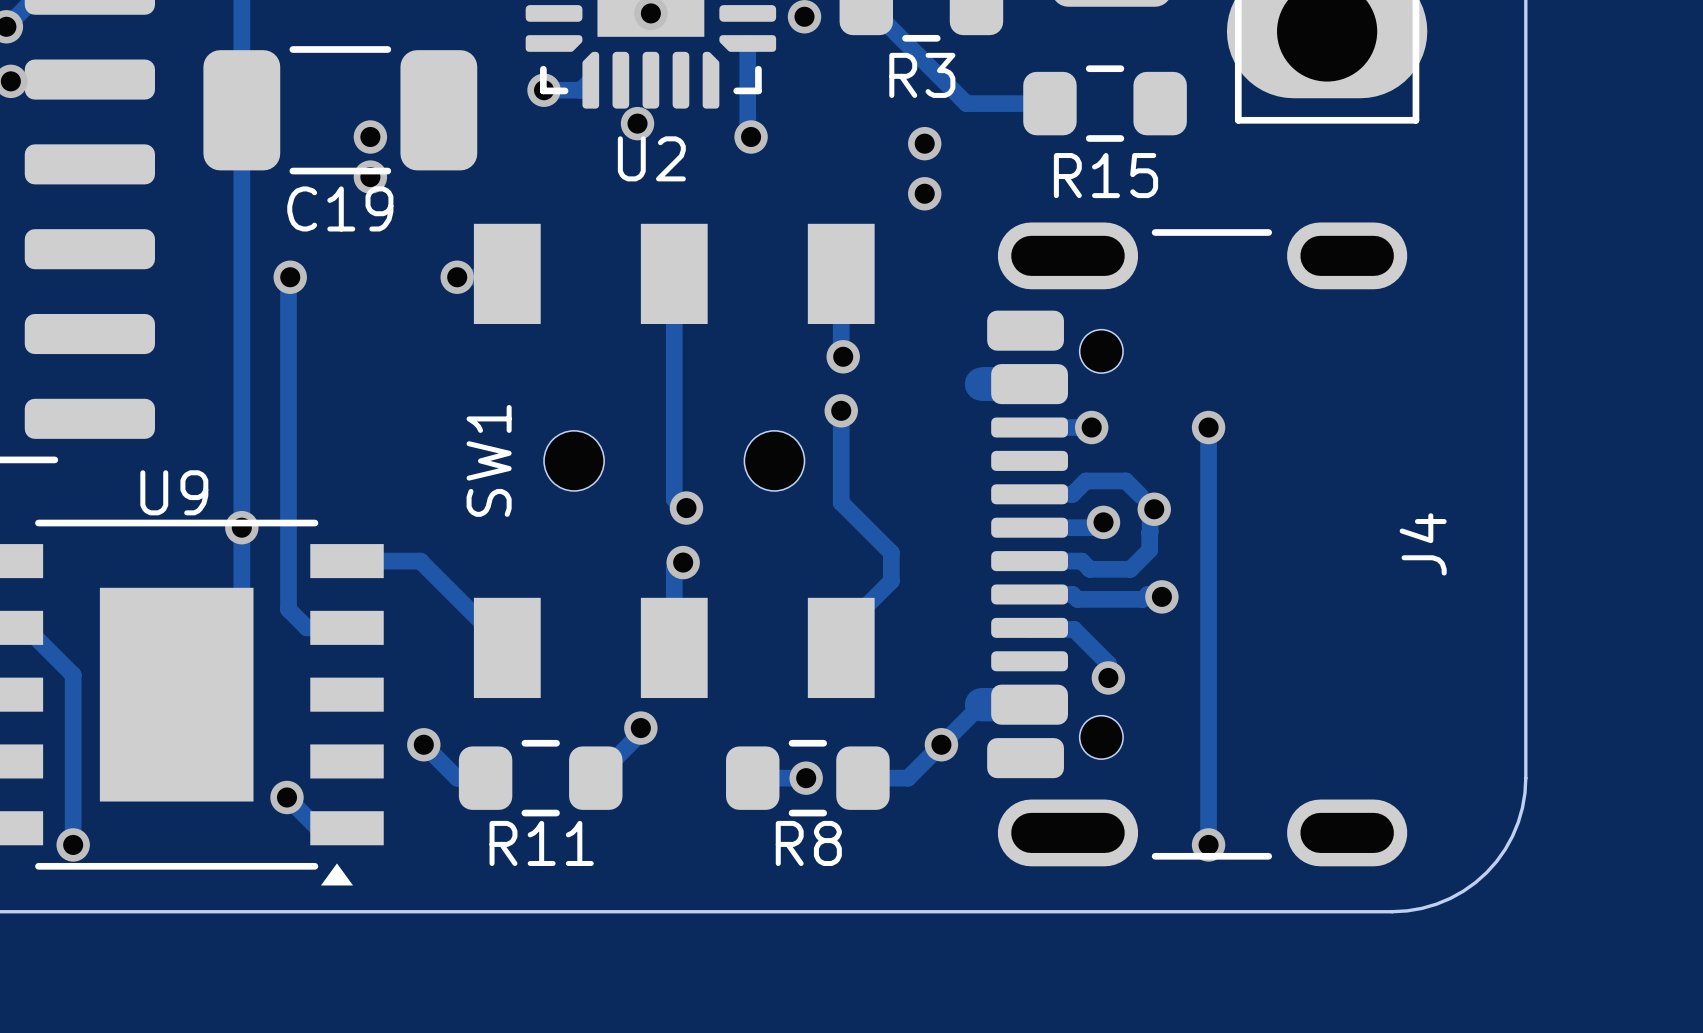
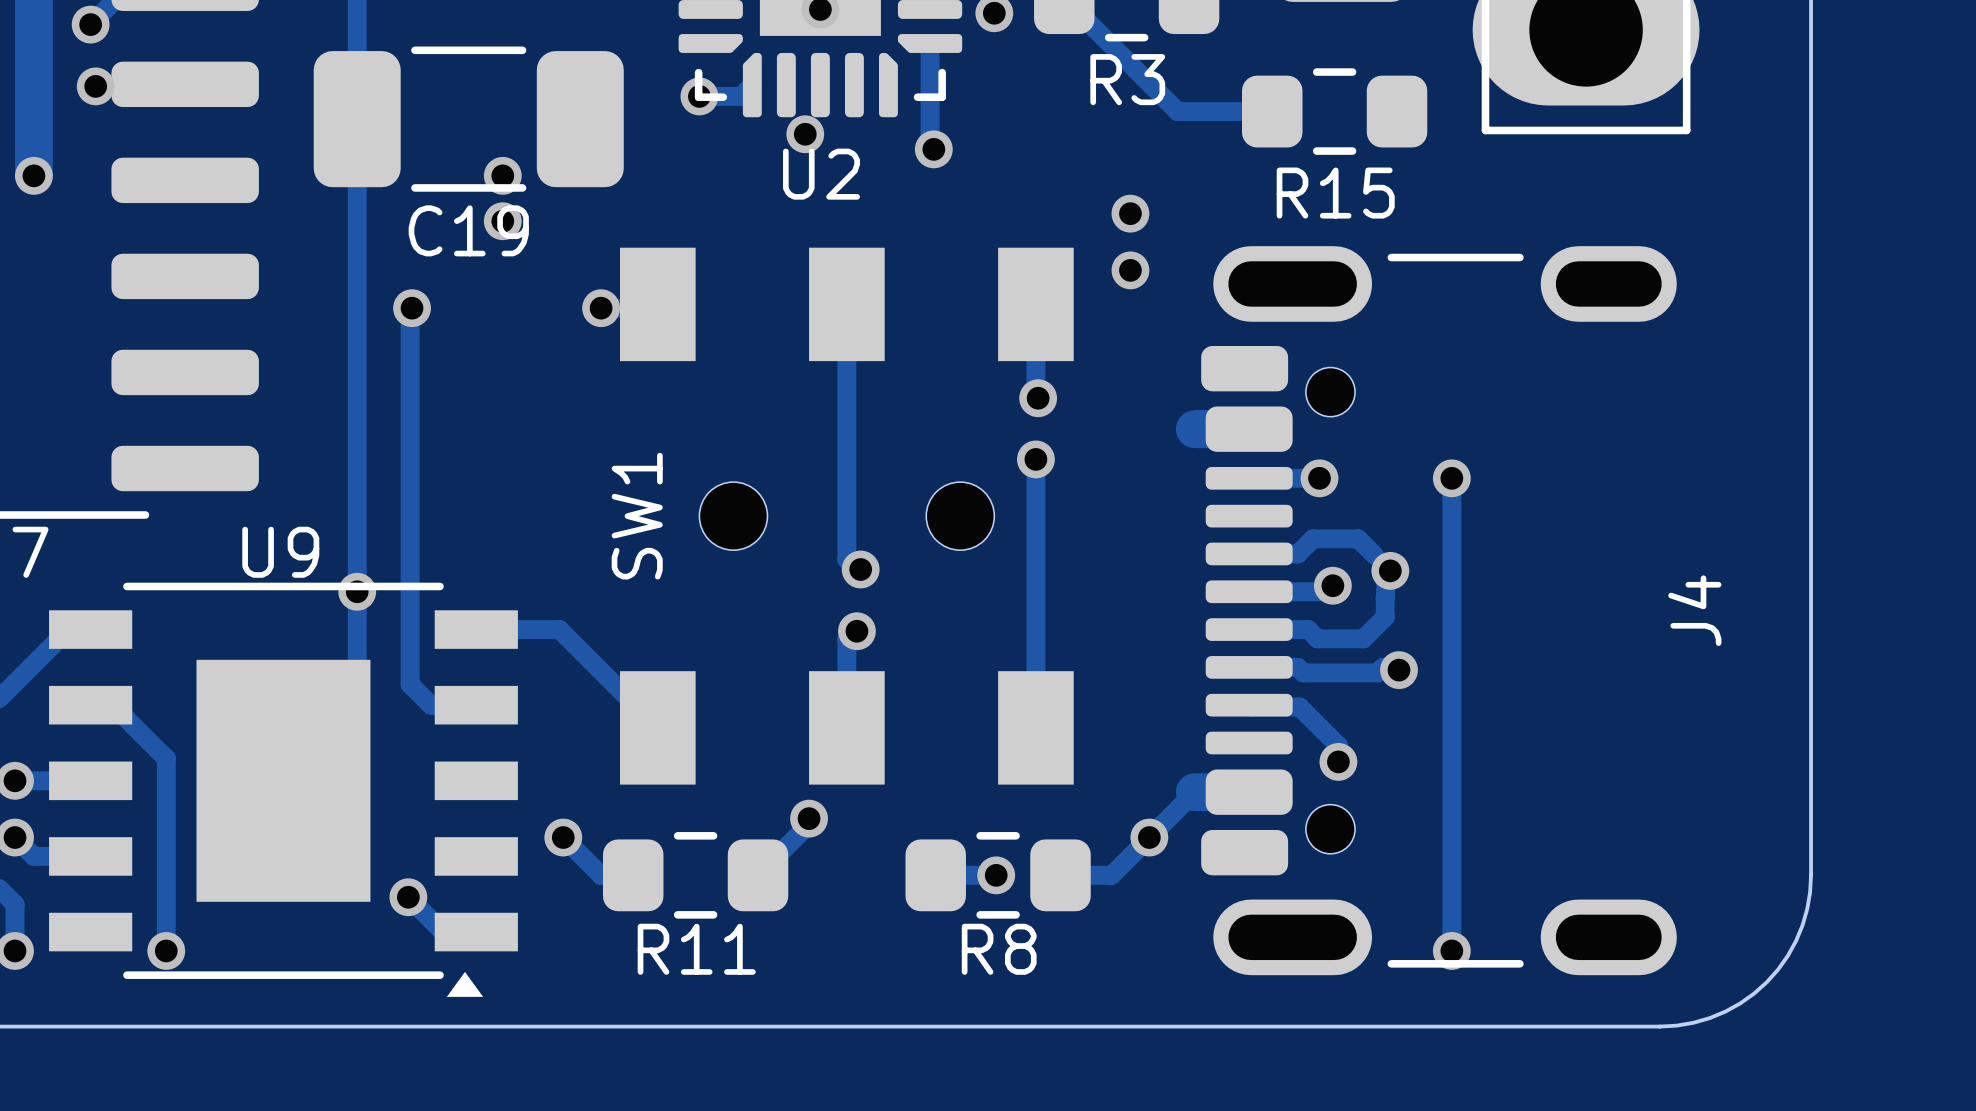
via: (370, 136) -> none
via position: (924, 143) -> (1130, 270)
via: none -> (502, 175)
via: (370, 177) -> none
via: none -> (502, 221)
track: (841, 502) (891, 552) (891, 581) (841, 631) -> (1035, 563) (1035, 708)

